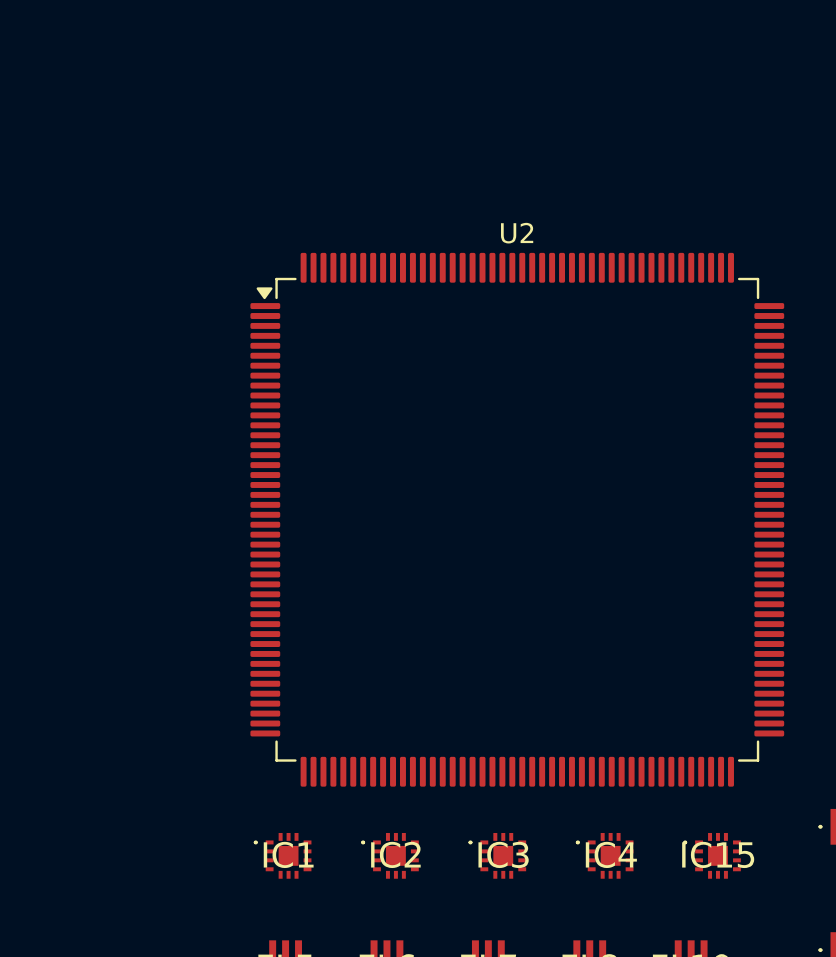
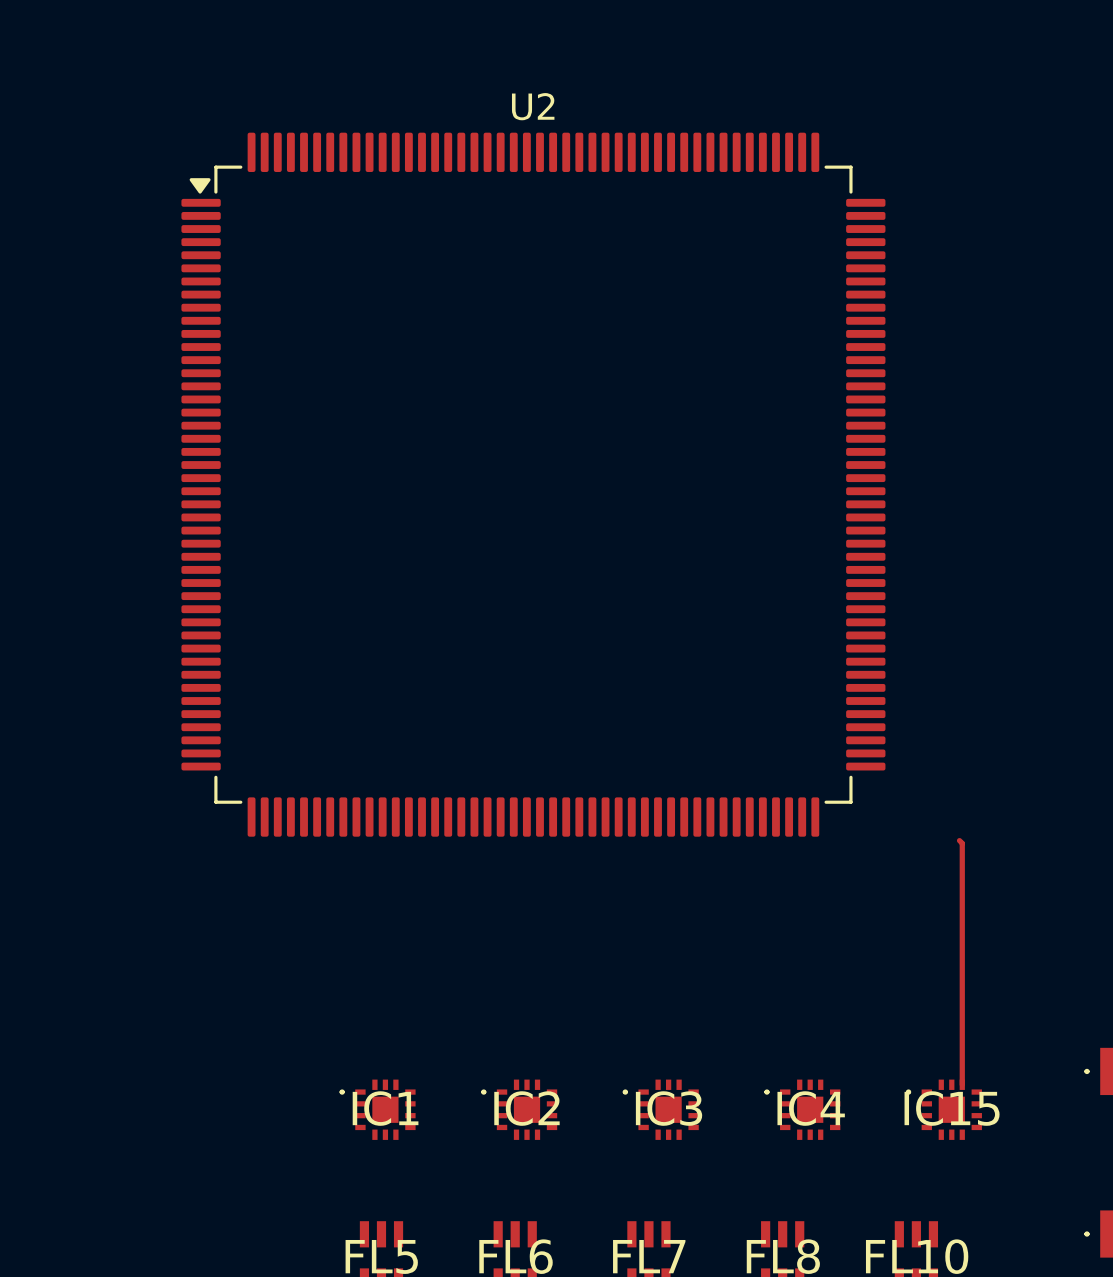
U2 position: (517, 519) -> (533, 484)
top track: none -> (959, 840) (962, 843) (962, 1084)

